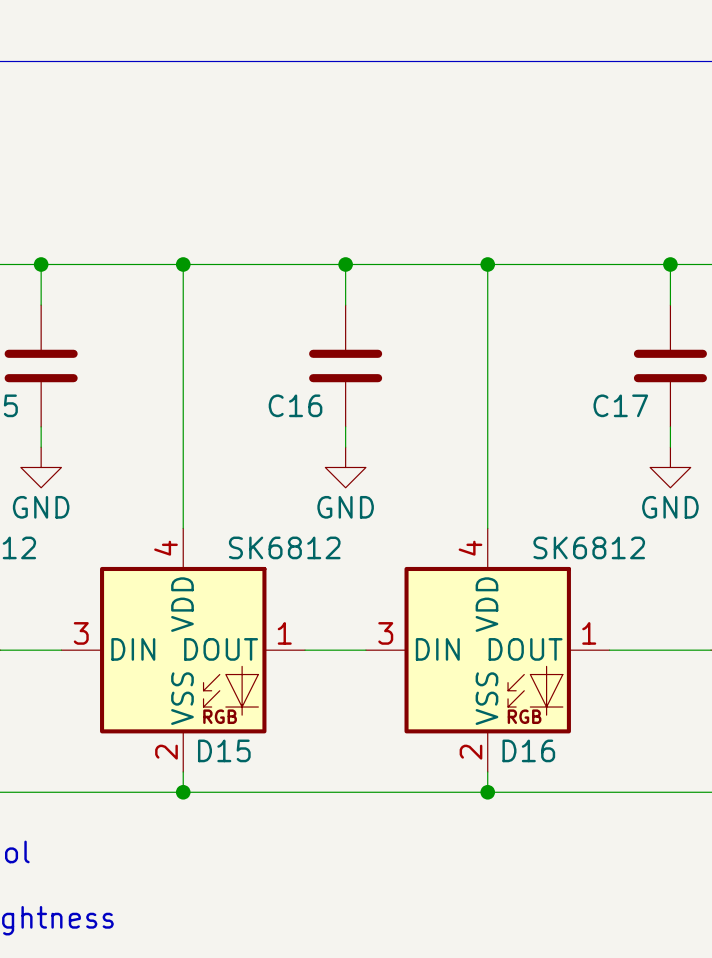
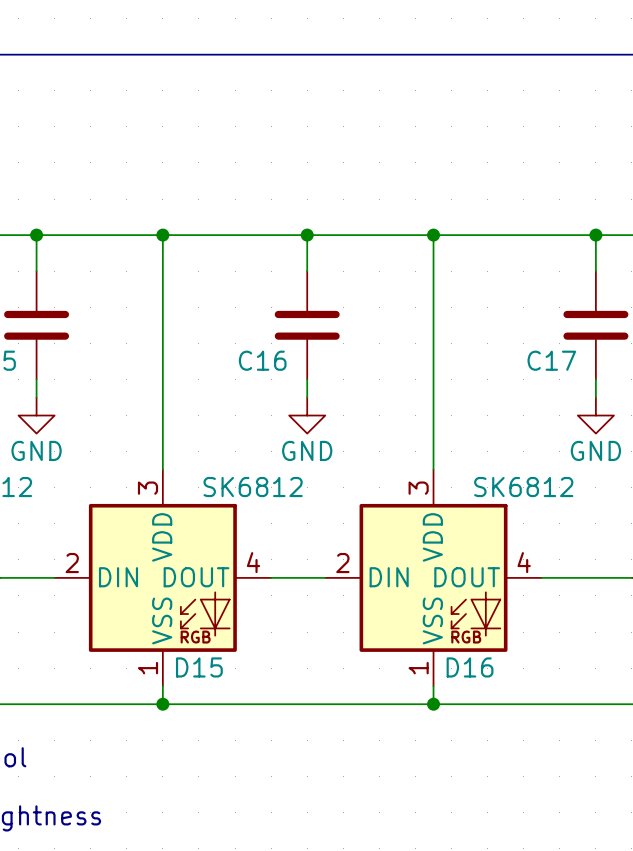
D15 pin number: 4 (166, 548) -> 3 (147, 488)
D16 pin number: 4 (470, 548) -> 3 (418, 488)
D15 pin number: 3 (81, 633) -> 2 (72, 563)
D15 pin number: 1 (284, 633) -> 4 (253, 562)
D16 pin number: 3 (385, 633) -> 2 (342, 563)
D16 pin number: 1 (589, 633) -> 4 (524, 562)
D15 pin number: 2 (166, 752) -> 1 (147, 668)
D16 pin number: 2 (470, 752) -> 1 (418, 668)

